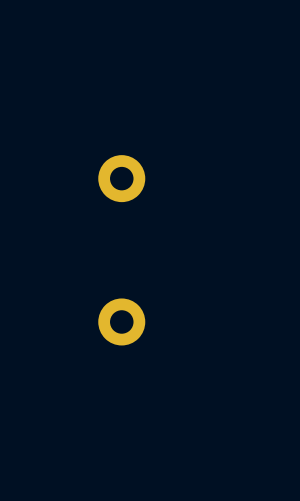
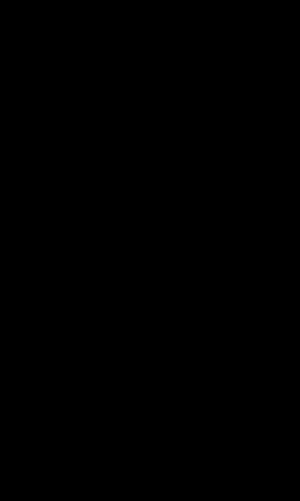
part: (121, 178) -> none
part: (121, 321) -> none

